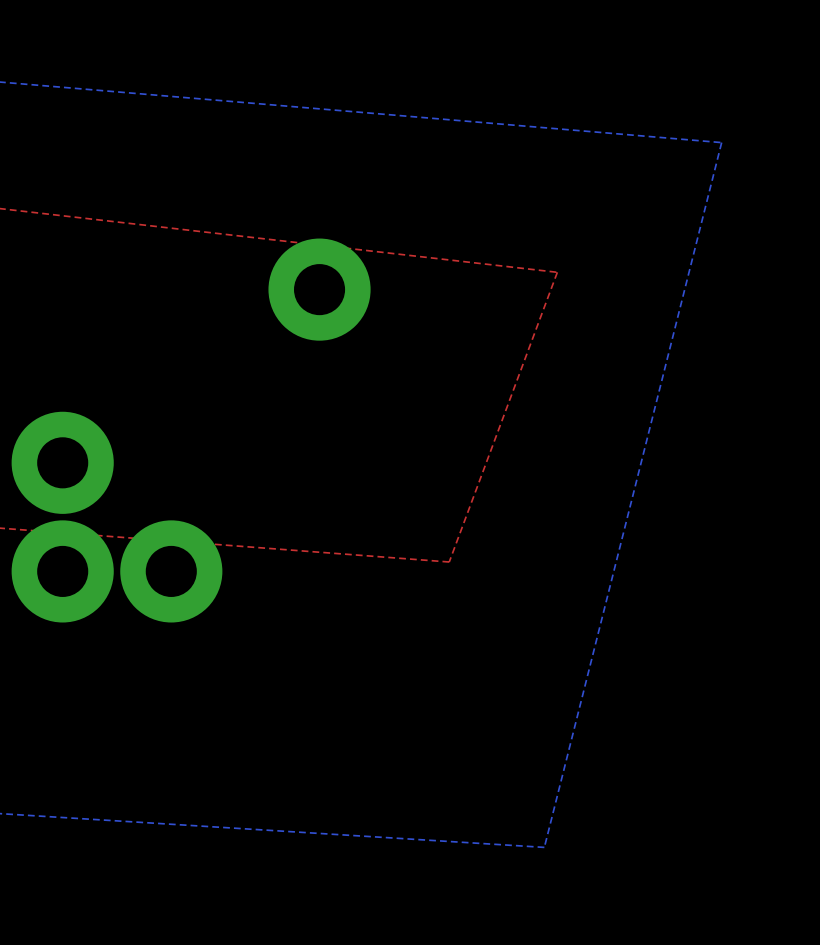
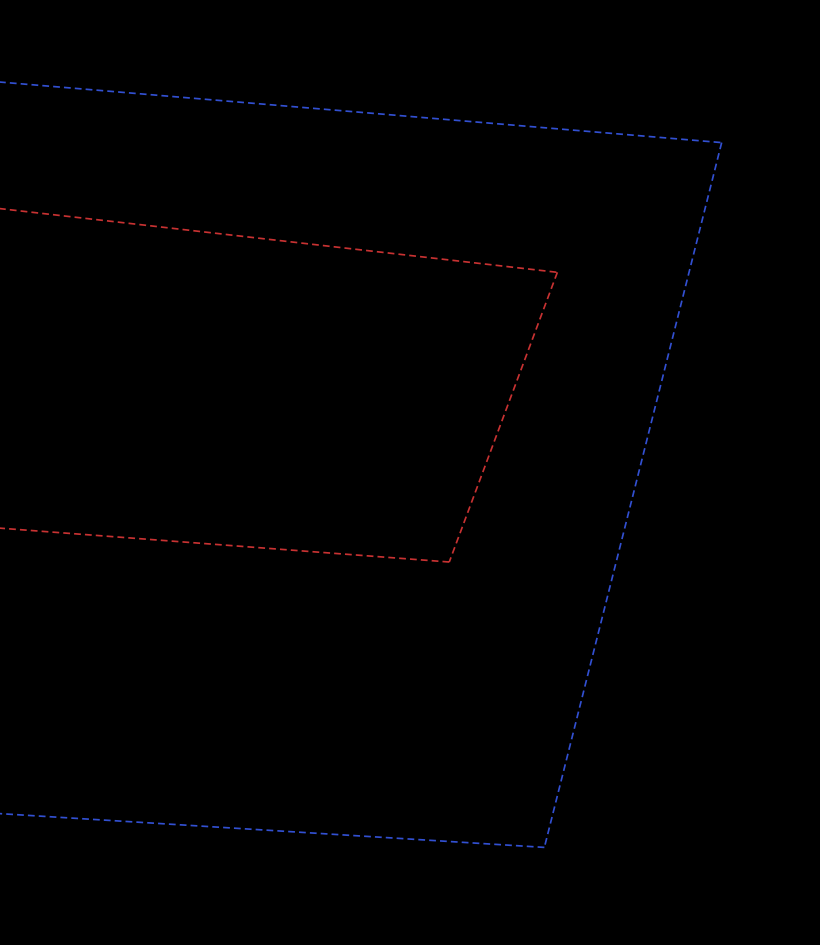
part: (319, 289) -> none
part: (62, 462) -> none
part: (62, 571) -> none
part: (171, 571) -> none

